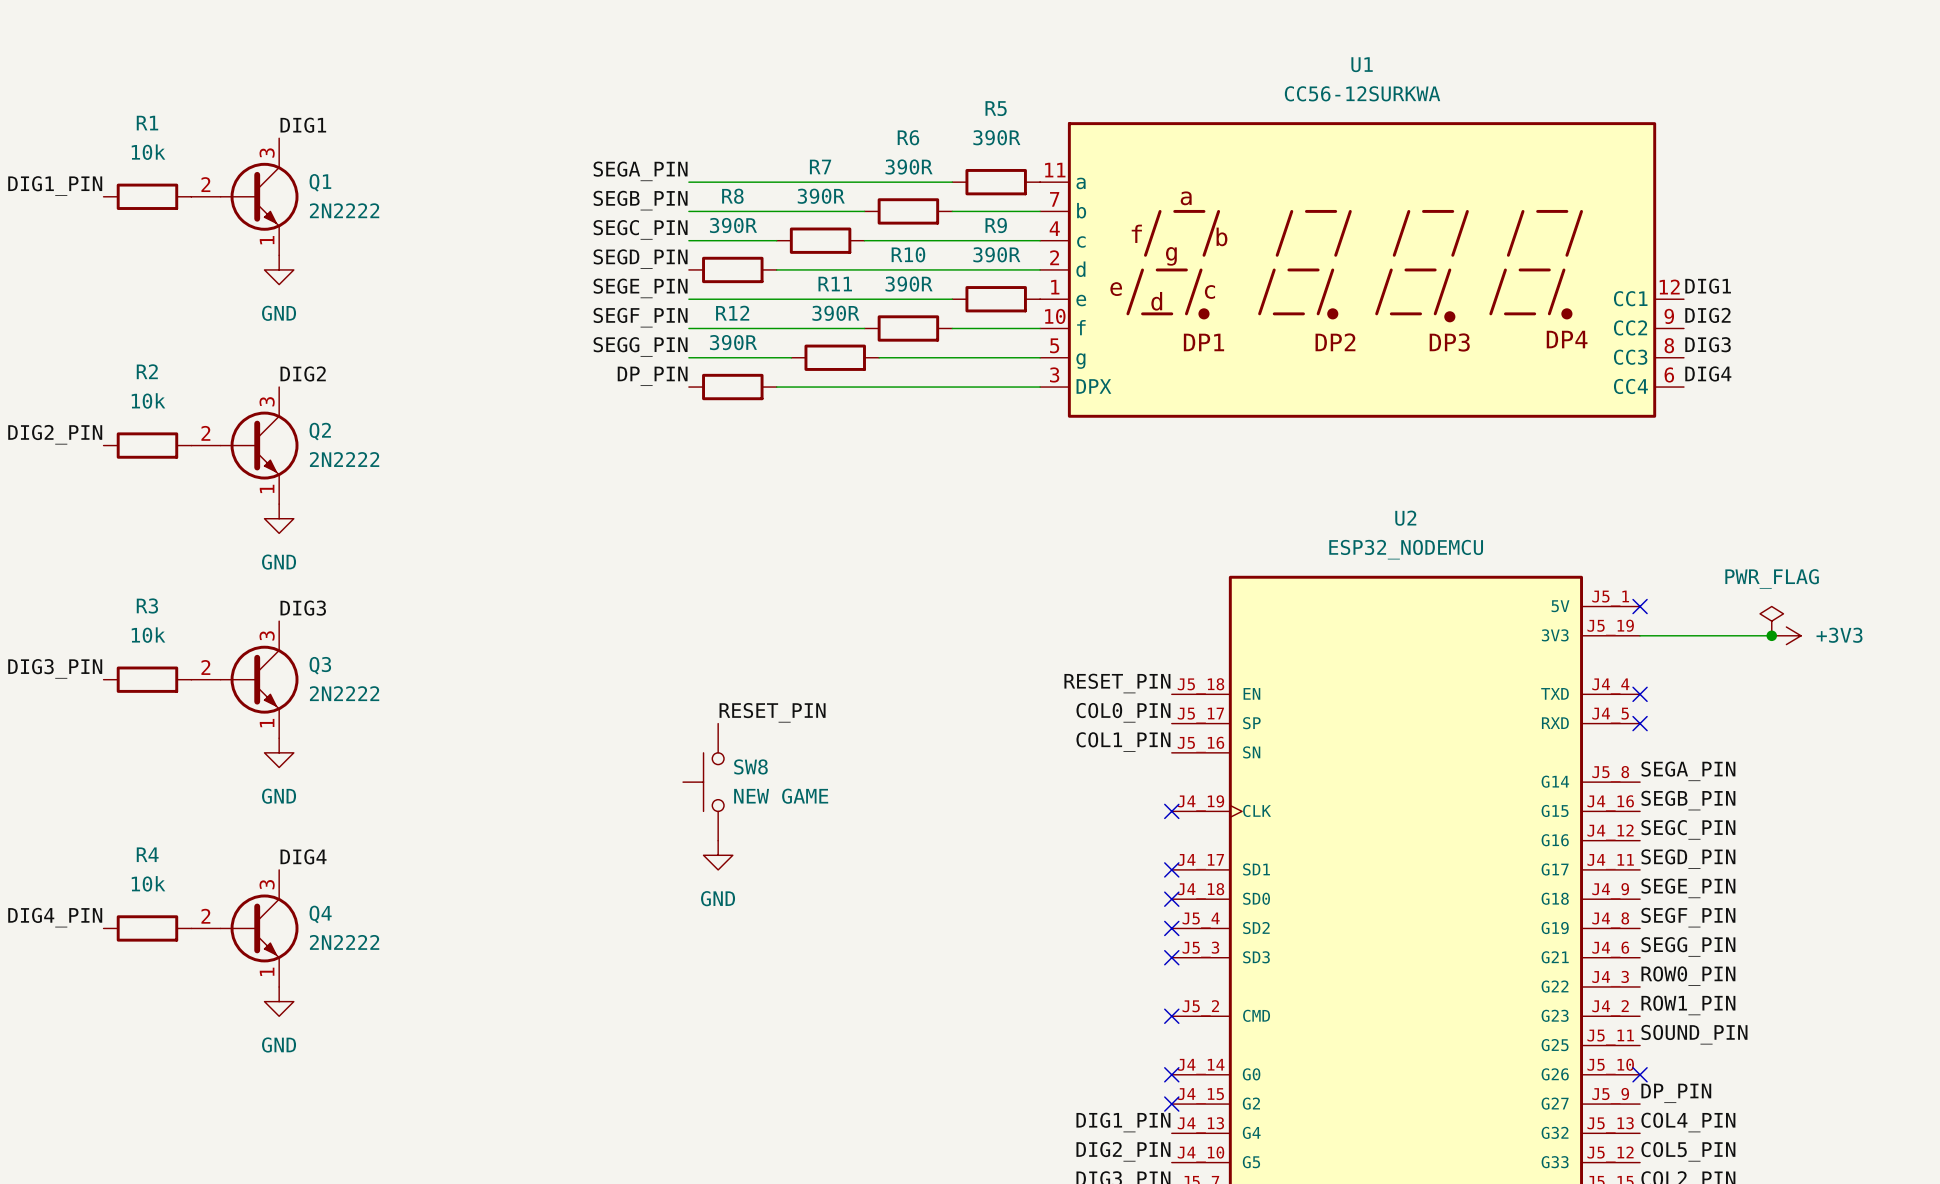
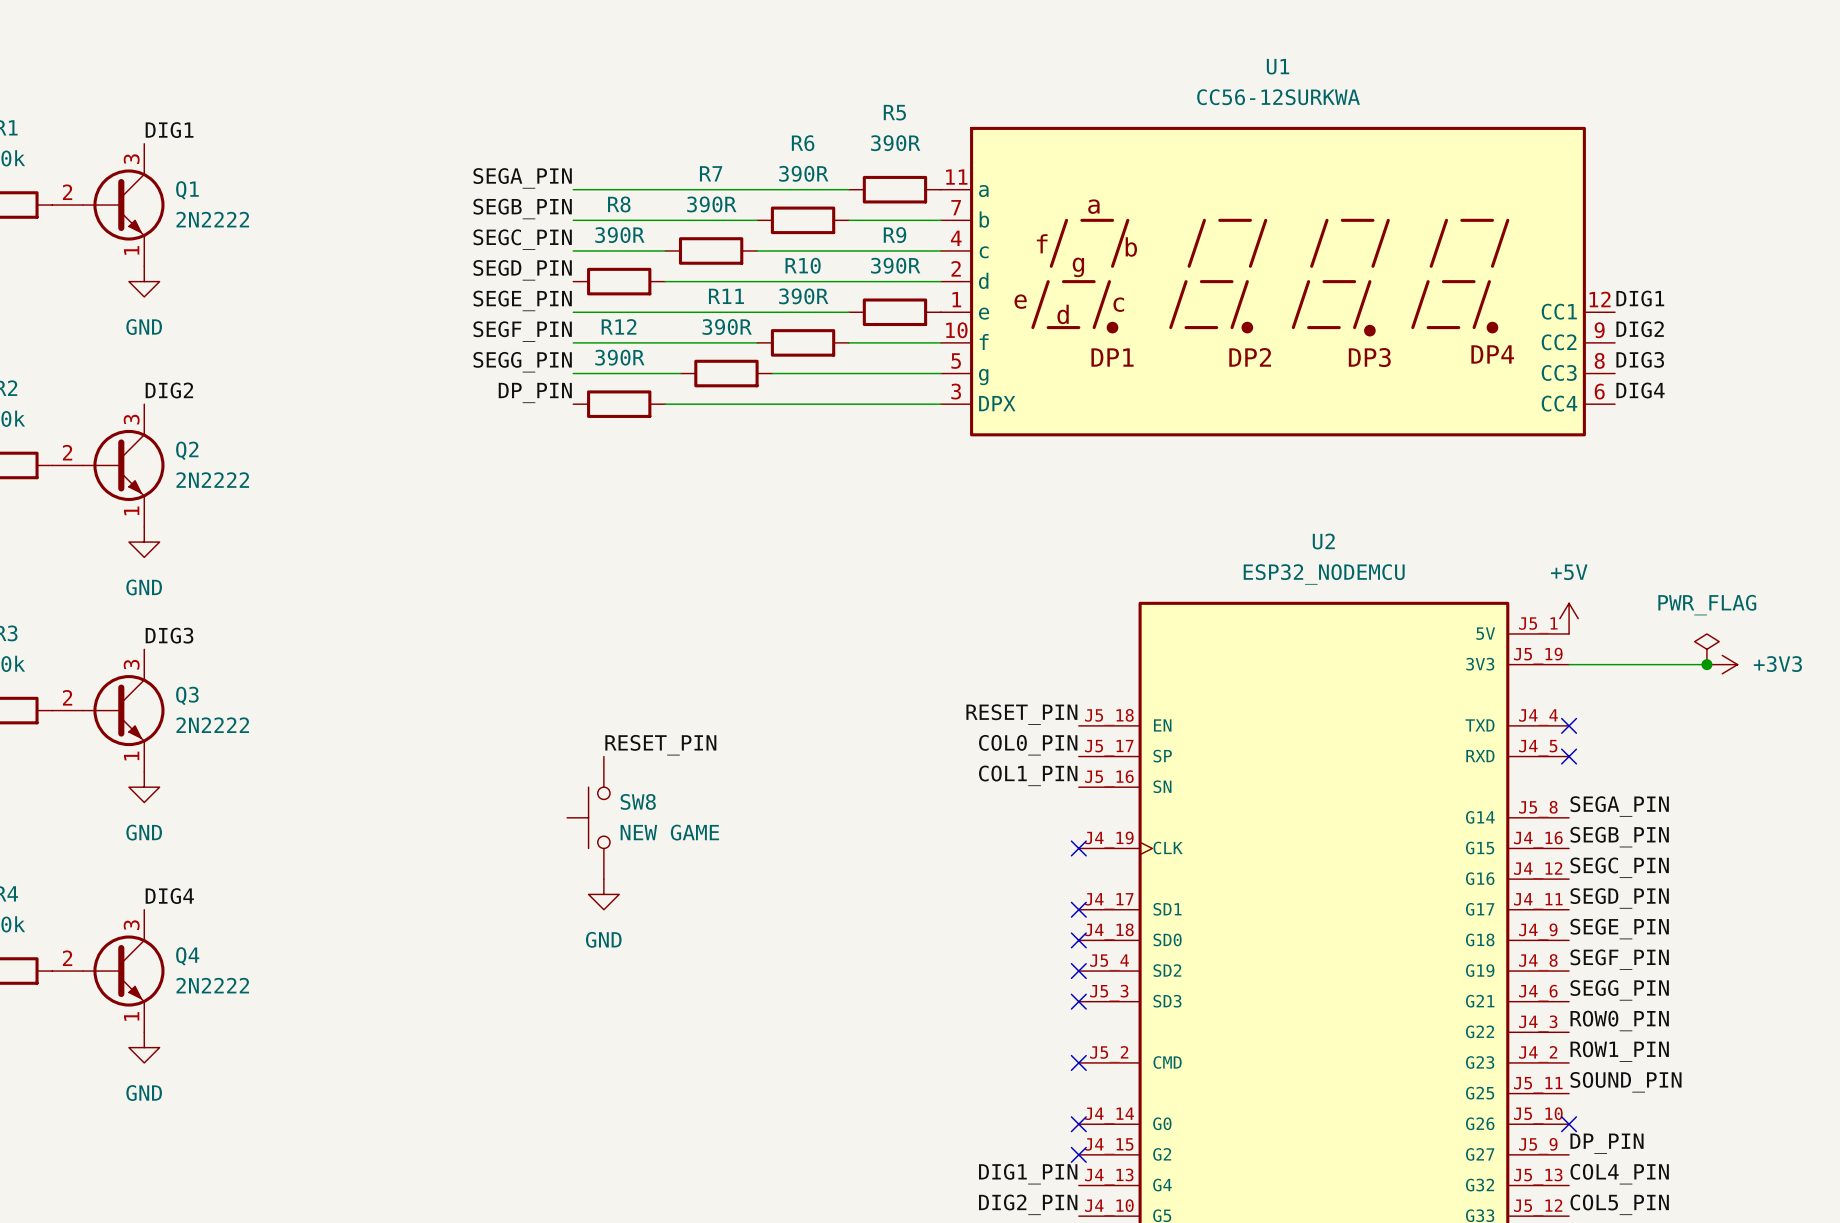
power symbol: none -> +5V (1569, 618)
no-connect mark: (1640, 606) -> none

